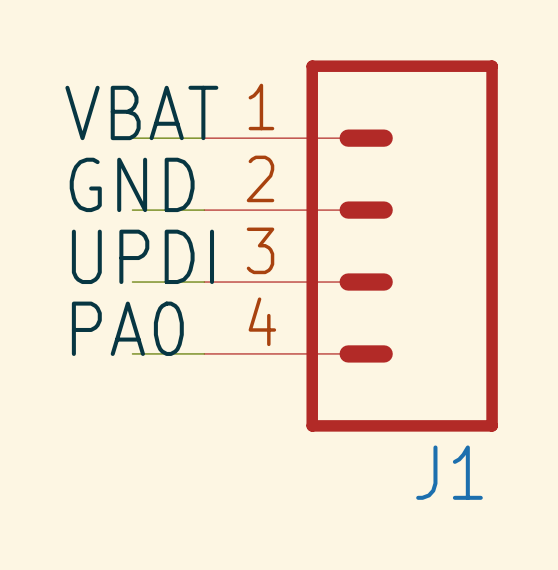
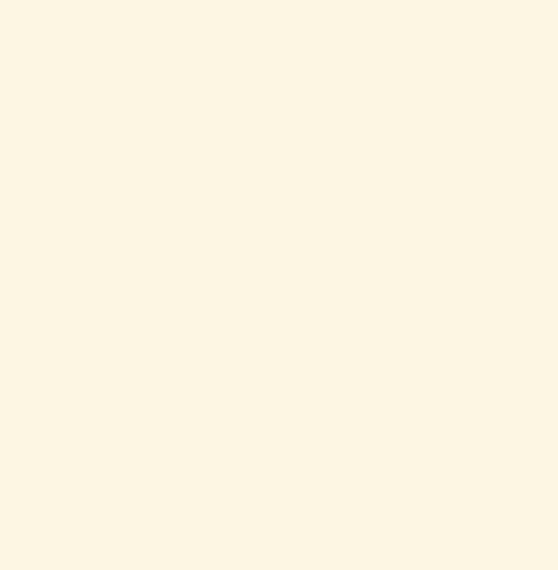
label: VBAT (141, 112) -> none
wire: (132, 138) (204, 138) -> none
label: GND (132, 184) -> none
wire: (132, 210) (204, 210) -> none
J1: (351, 246) -> none
label: UPDI (142, 256) -> none
wire: (132, 282) (204, 282) -> none
label: PA0 (127, 328) -> none
wire: (132, 353) (204, 353) -> none

